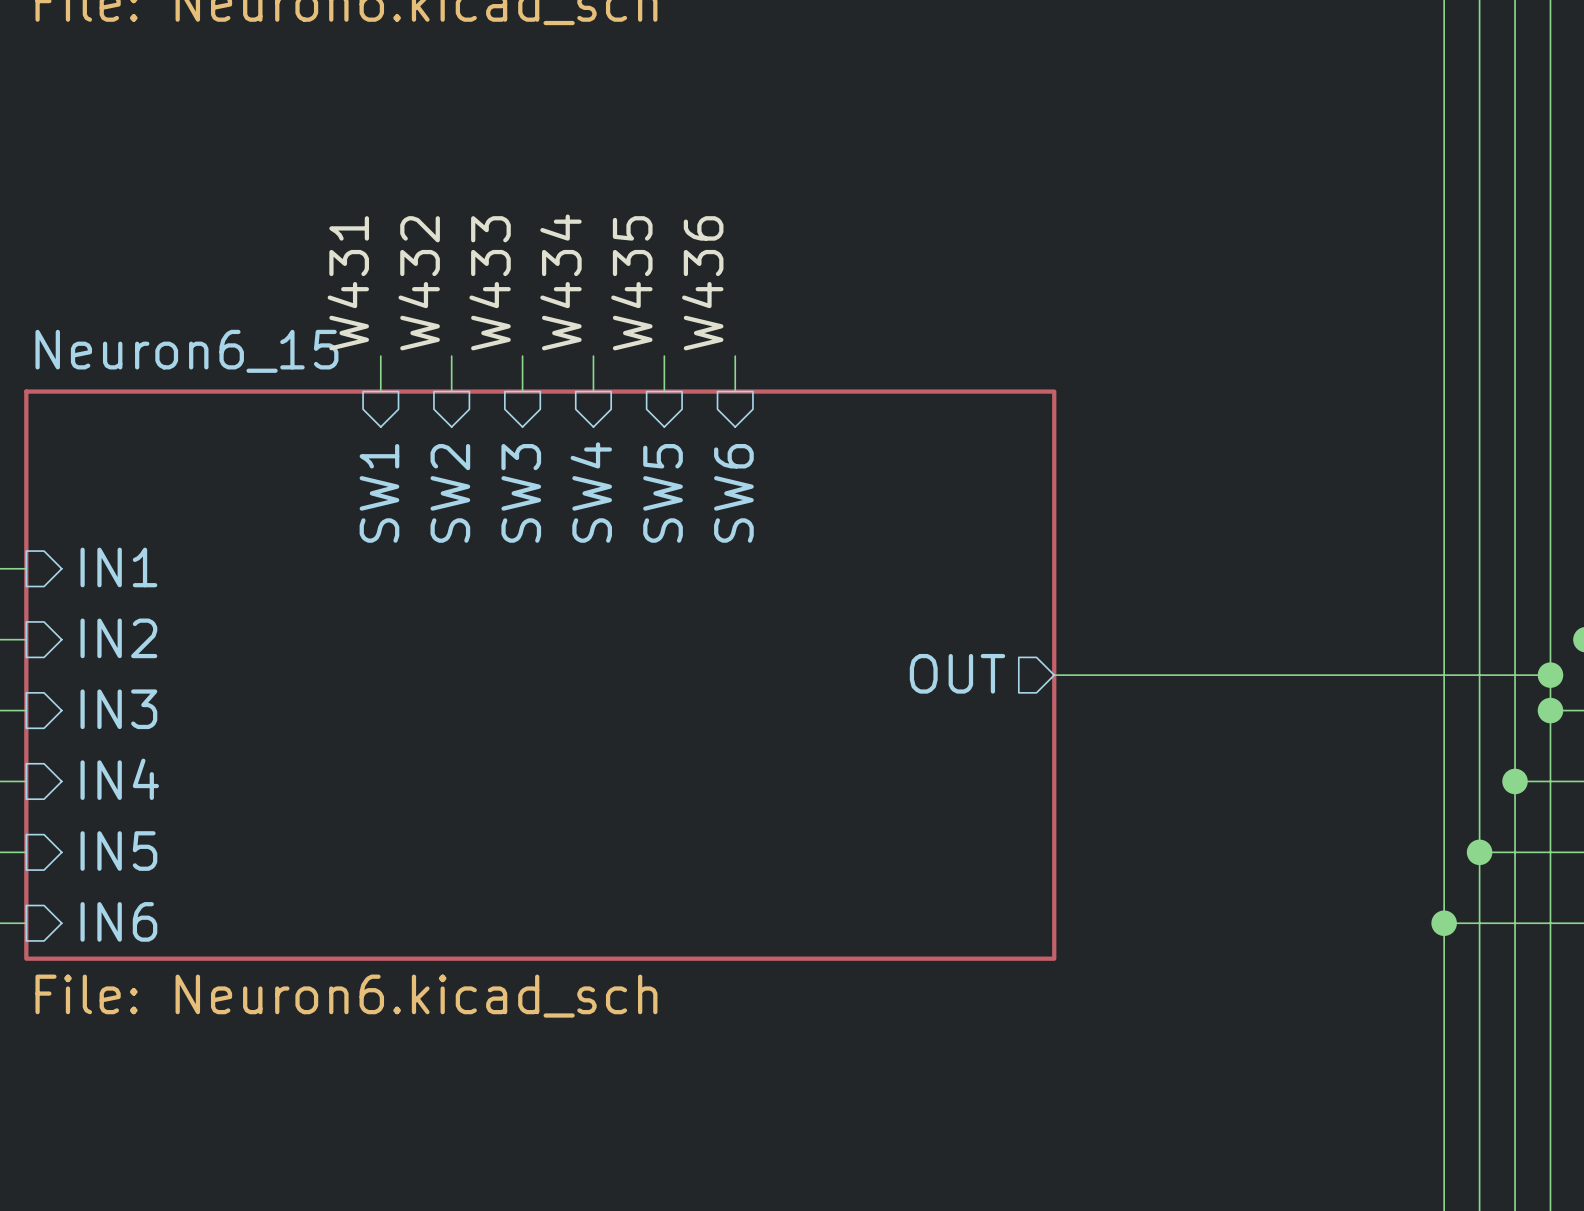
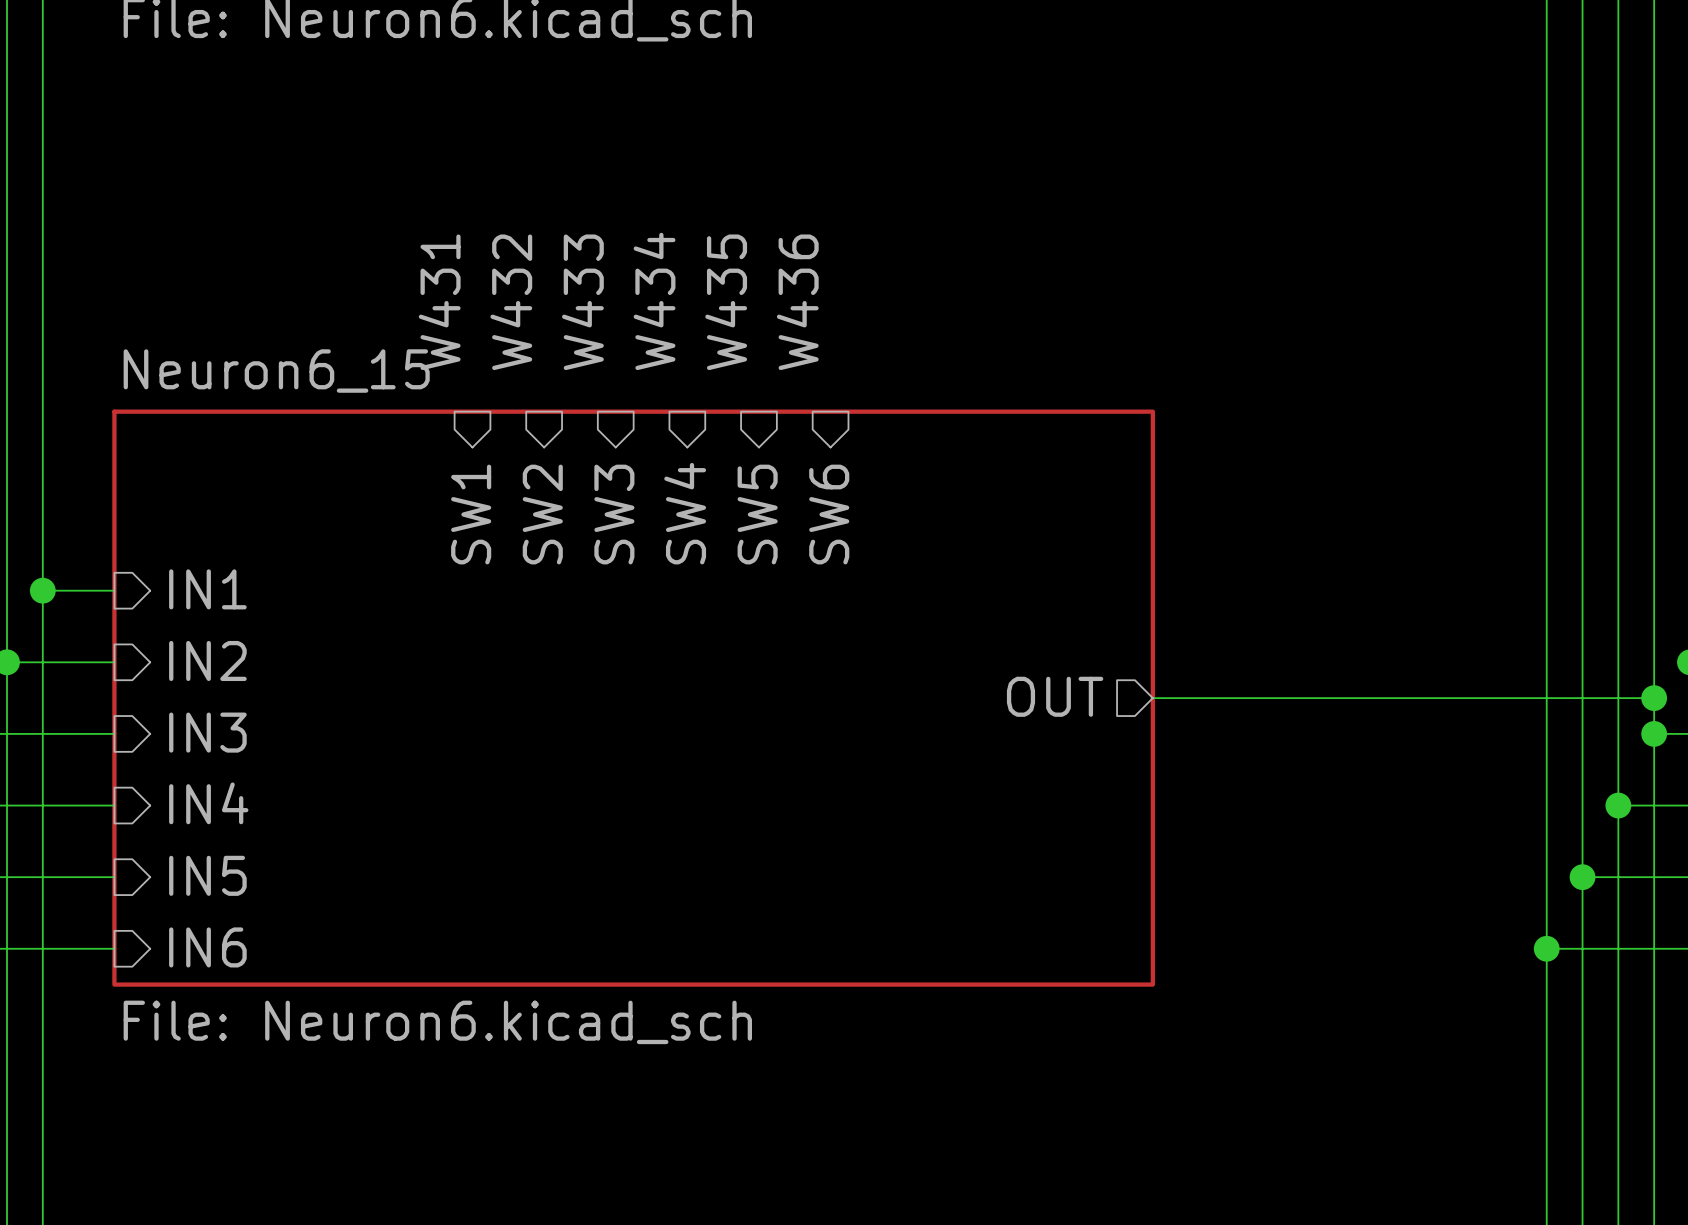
wire: (380, 356) (380, 391) -> none
wire: (451, 356) (451, 391) -> none
wire: (522, 356) (522, 391) -> none
wire: (593, 356) (593, 391) -> none
wire: (664, 356) (664, 391) -> none
wire: (735, 356) (735, 391) -> none

